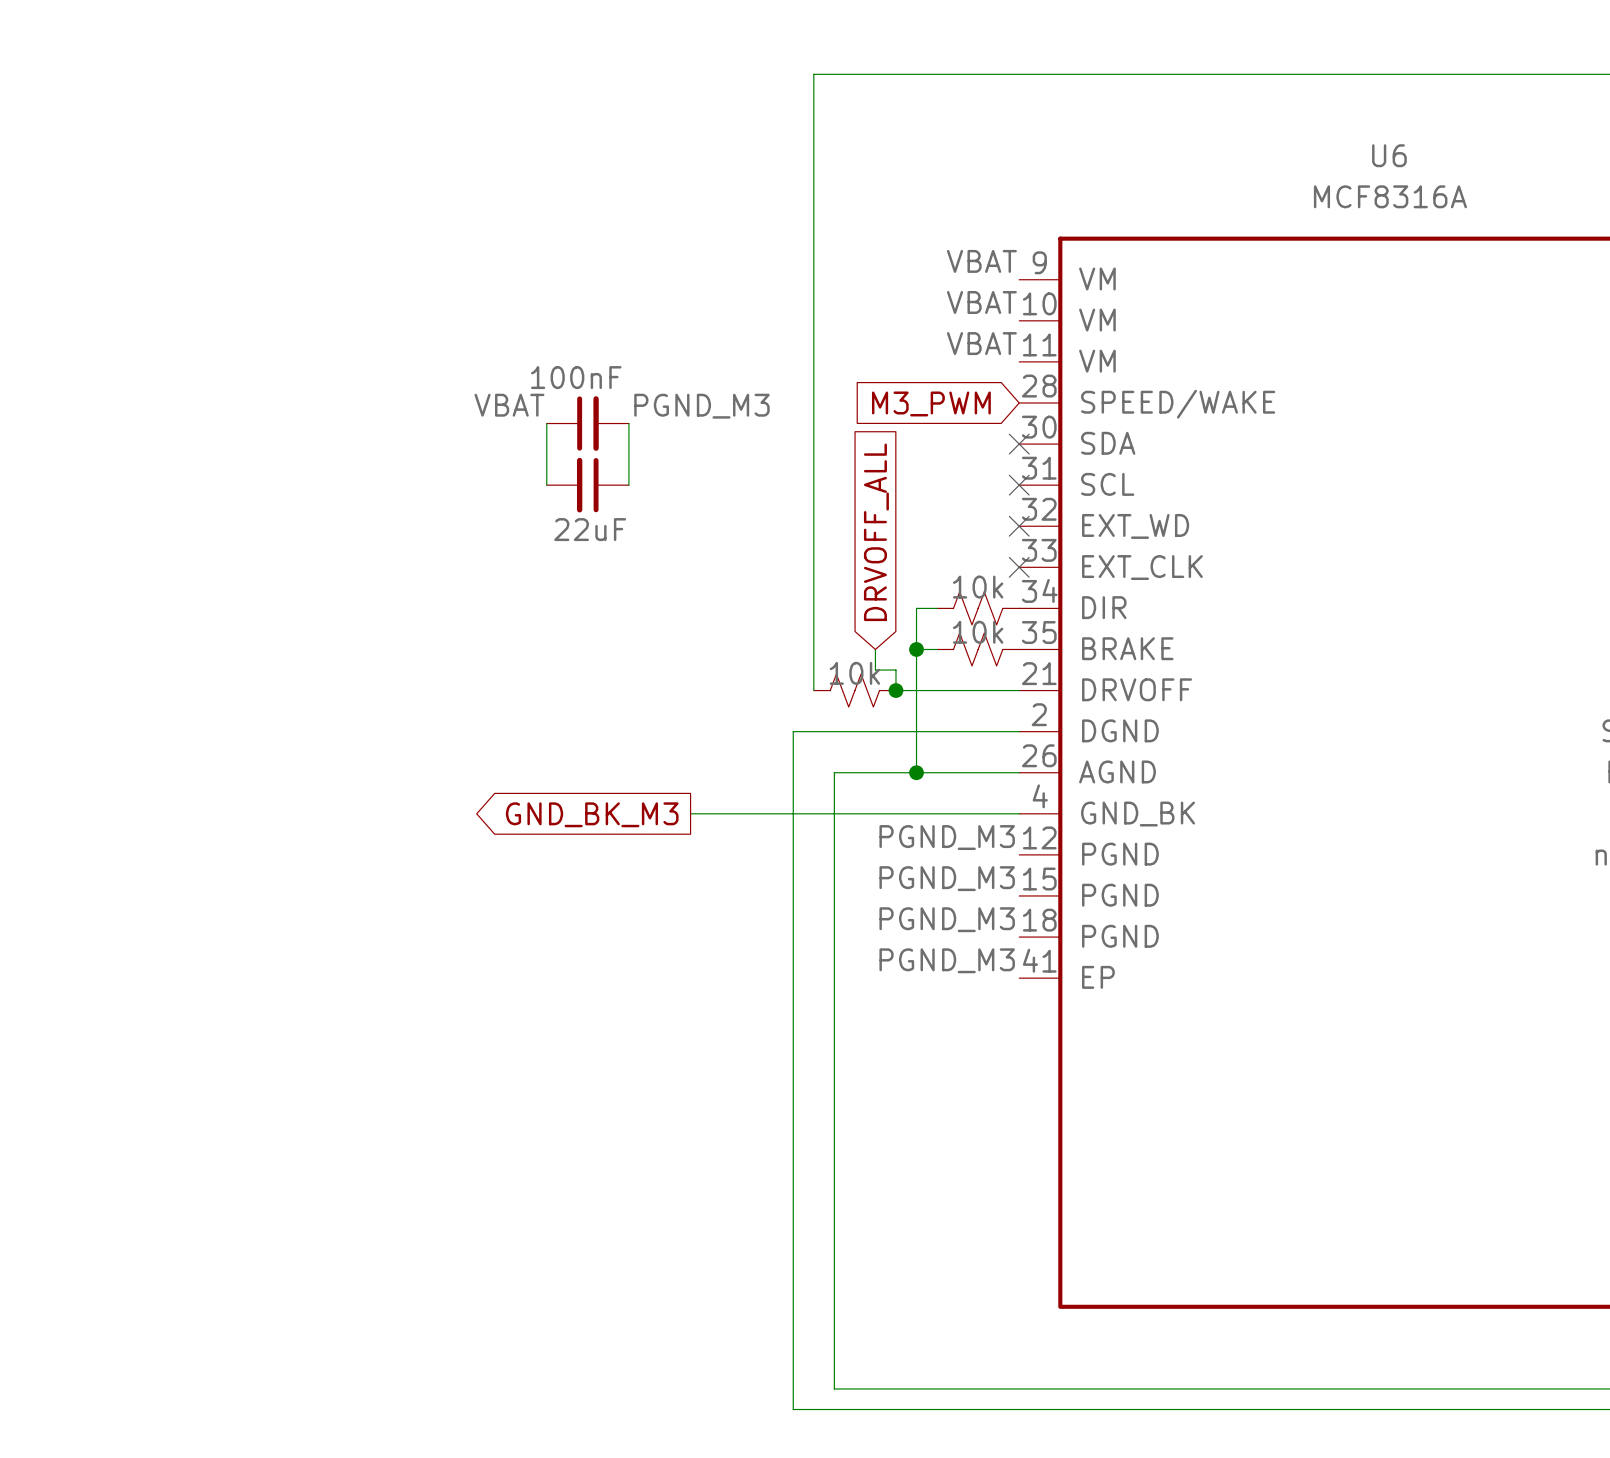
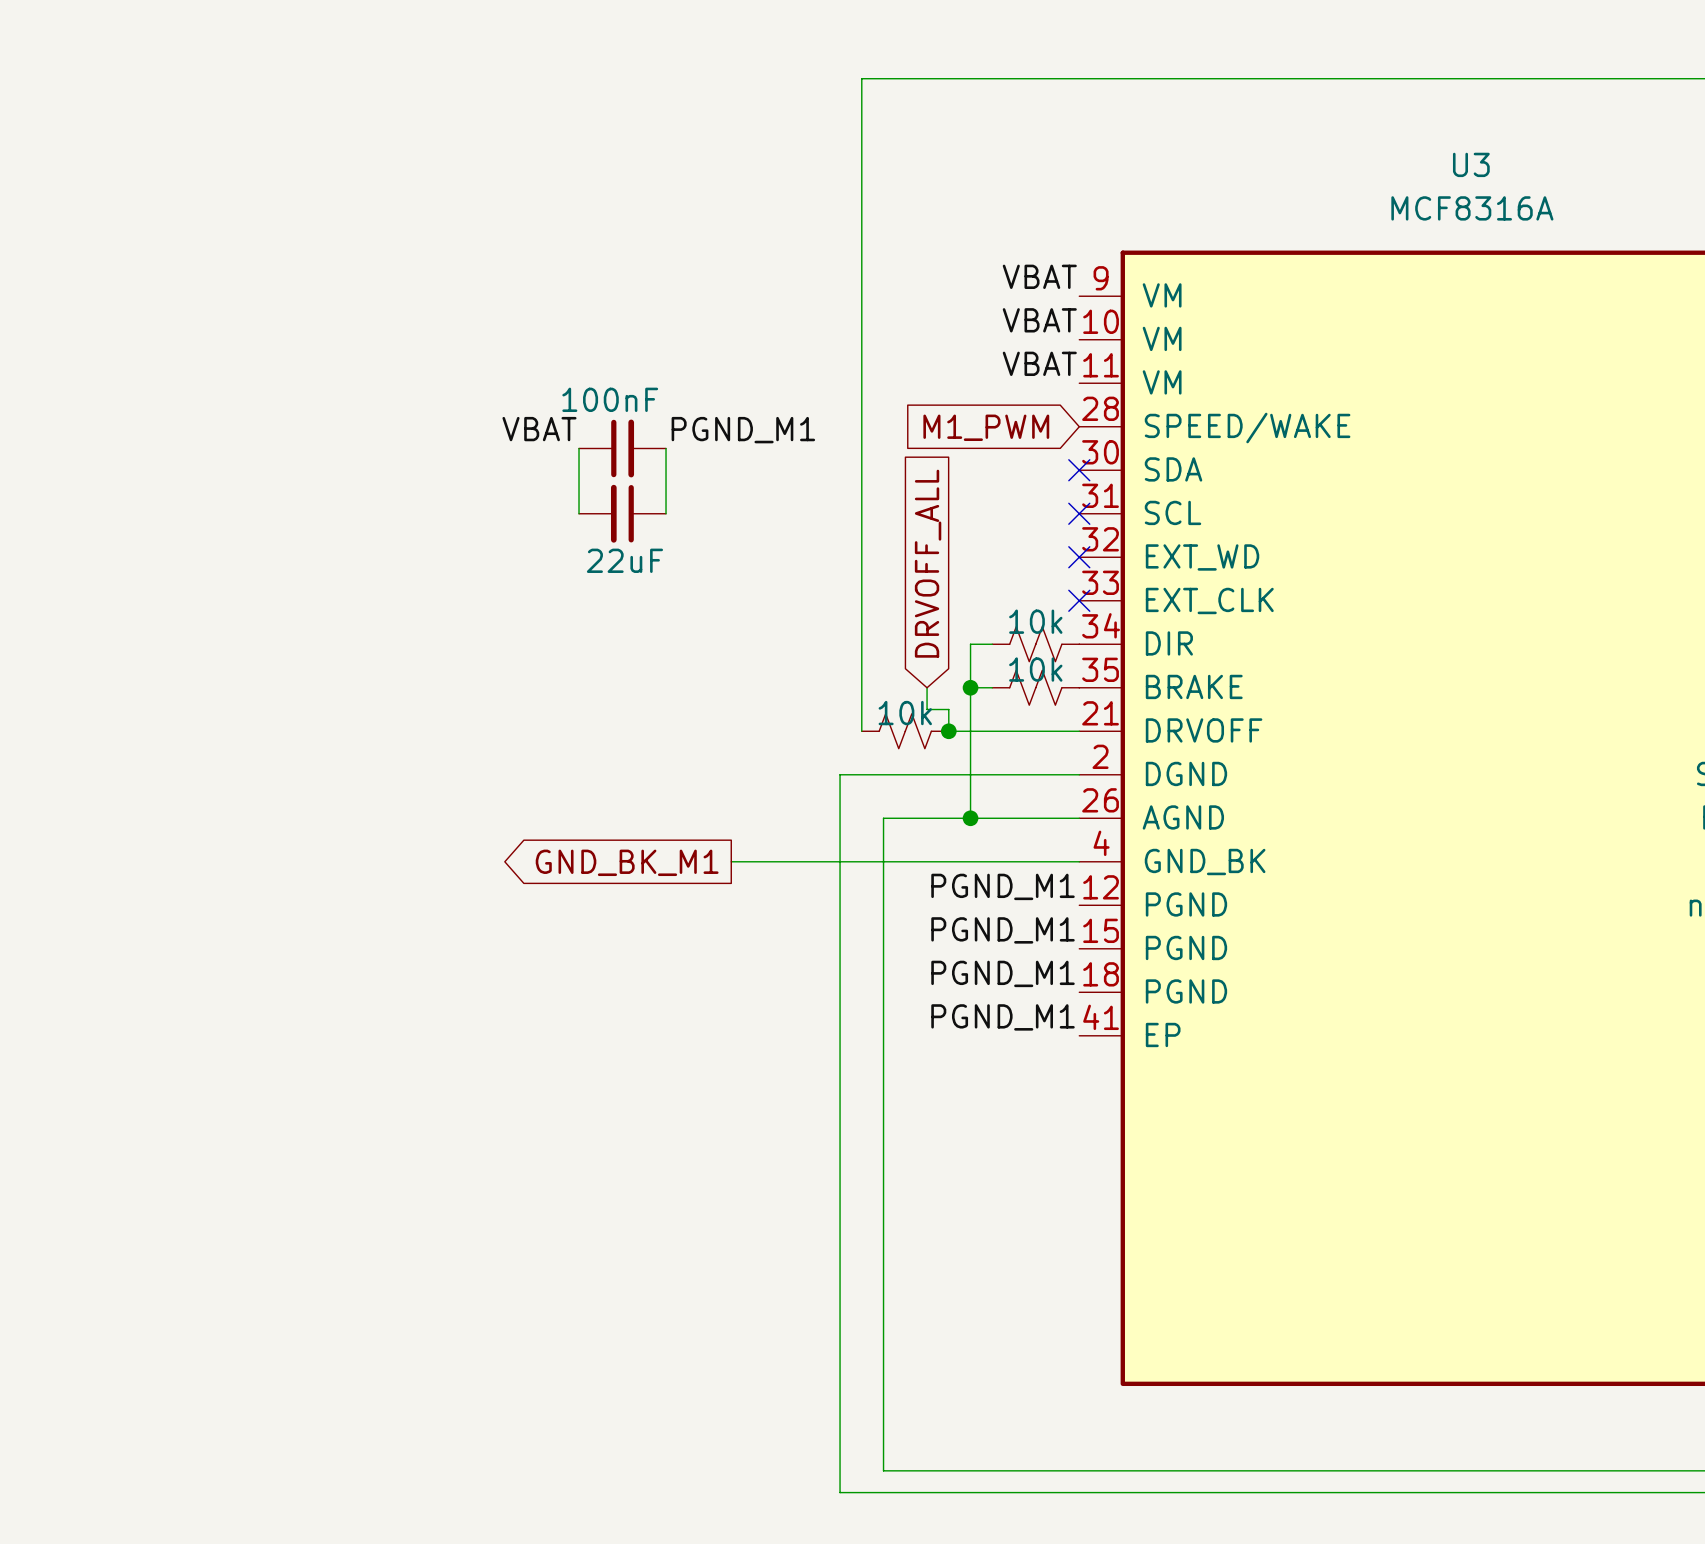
U6 name: U6 (1389, 155) -> U3 (1471, 164)
global label: M3_PWM (931, 403) -> M1_PWM (986, 427)
label: PGND_M3 (701, 406) -> PGND_M1 (743, 430)
global label: GND_BK_M3 (592, 814) -> GND_BK_M1 (627, 862)
label: PGND_M3 (947, 837) -> PGND_M1 (1003, 886)
label: PGND_M3 (947, 878) -> PGND_M1 (1003, 930)
label: PGND_M3 (947, 919) -> PGND_M1 (1003, 973)
label: PGND_M3 (947, 960) -> PGND_M1 (1003, 1017)

